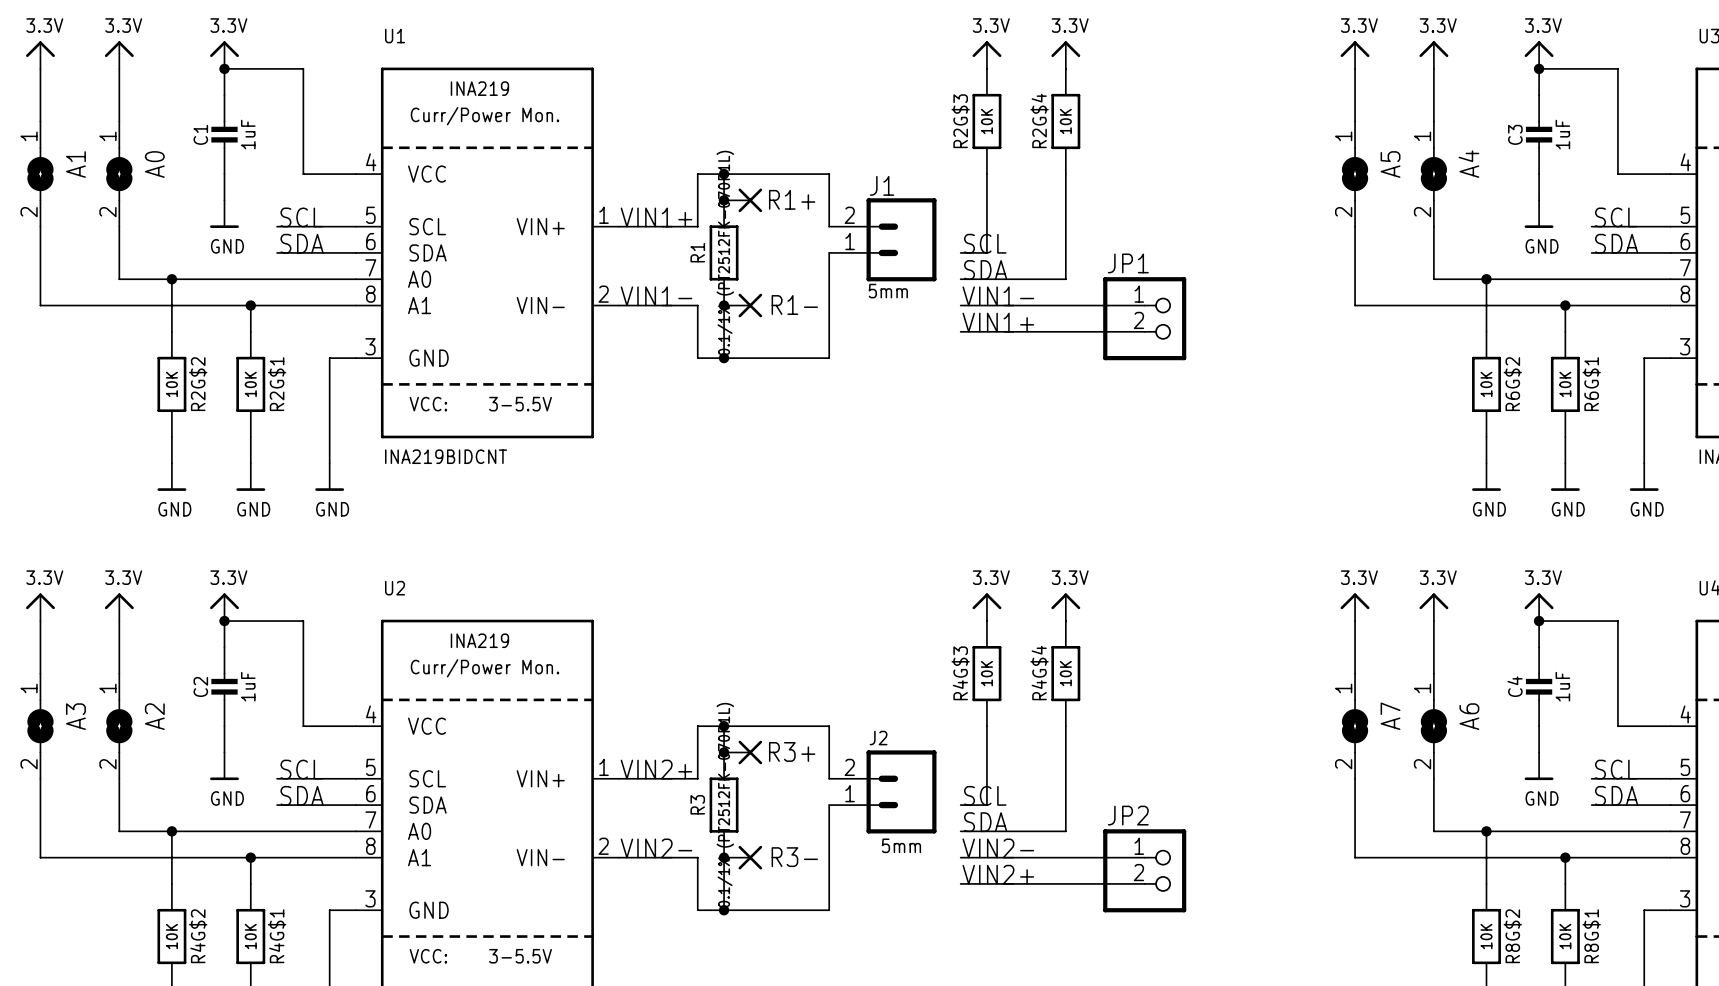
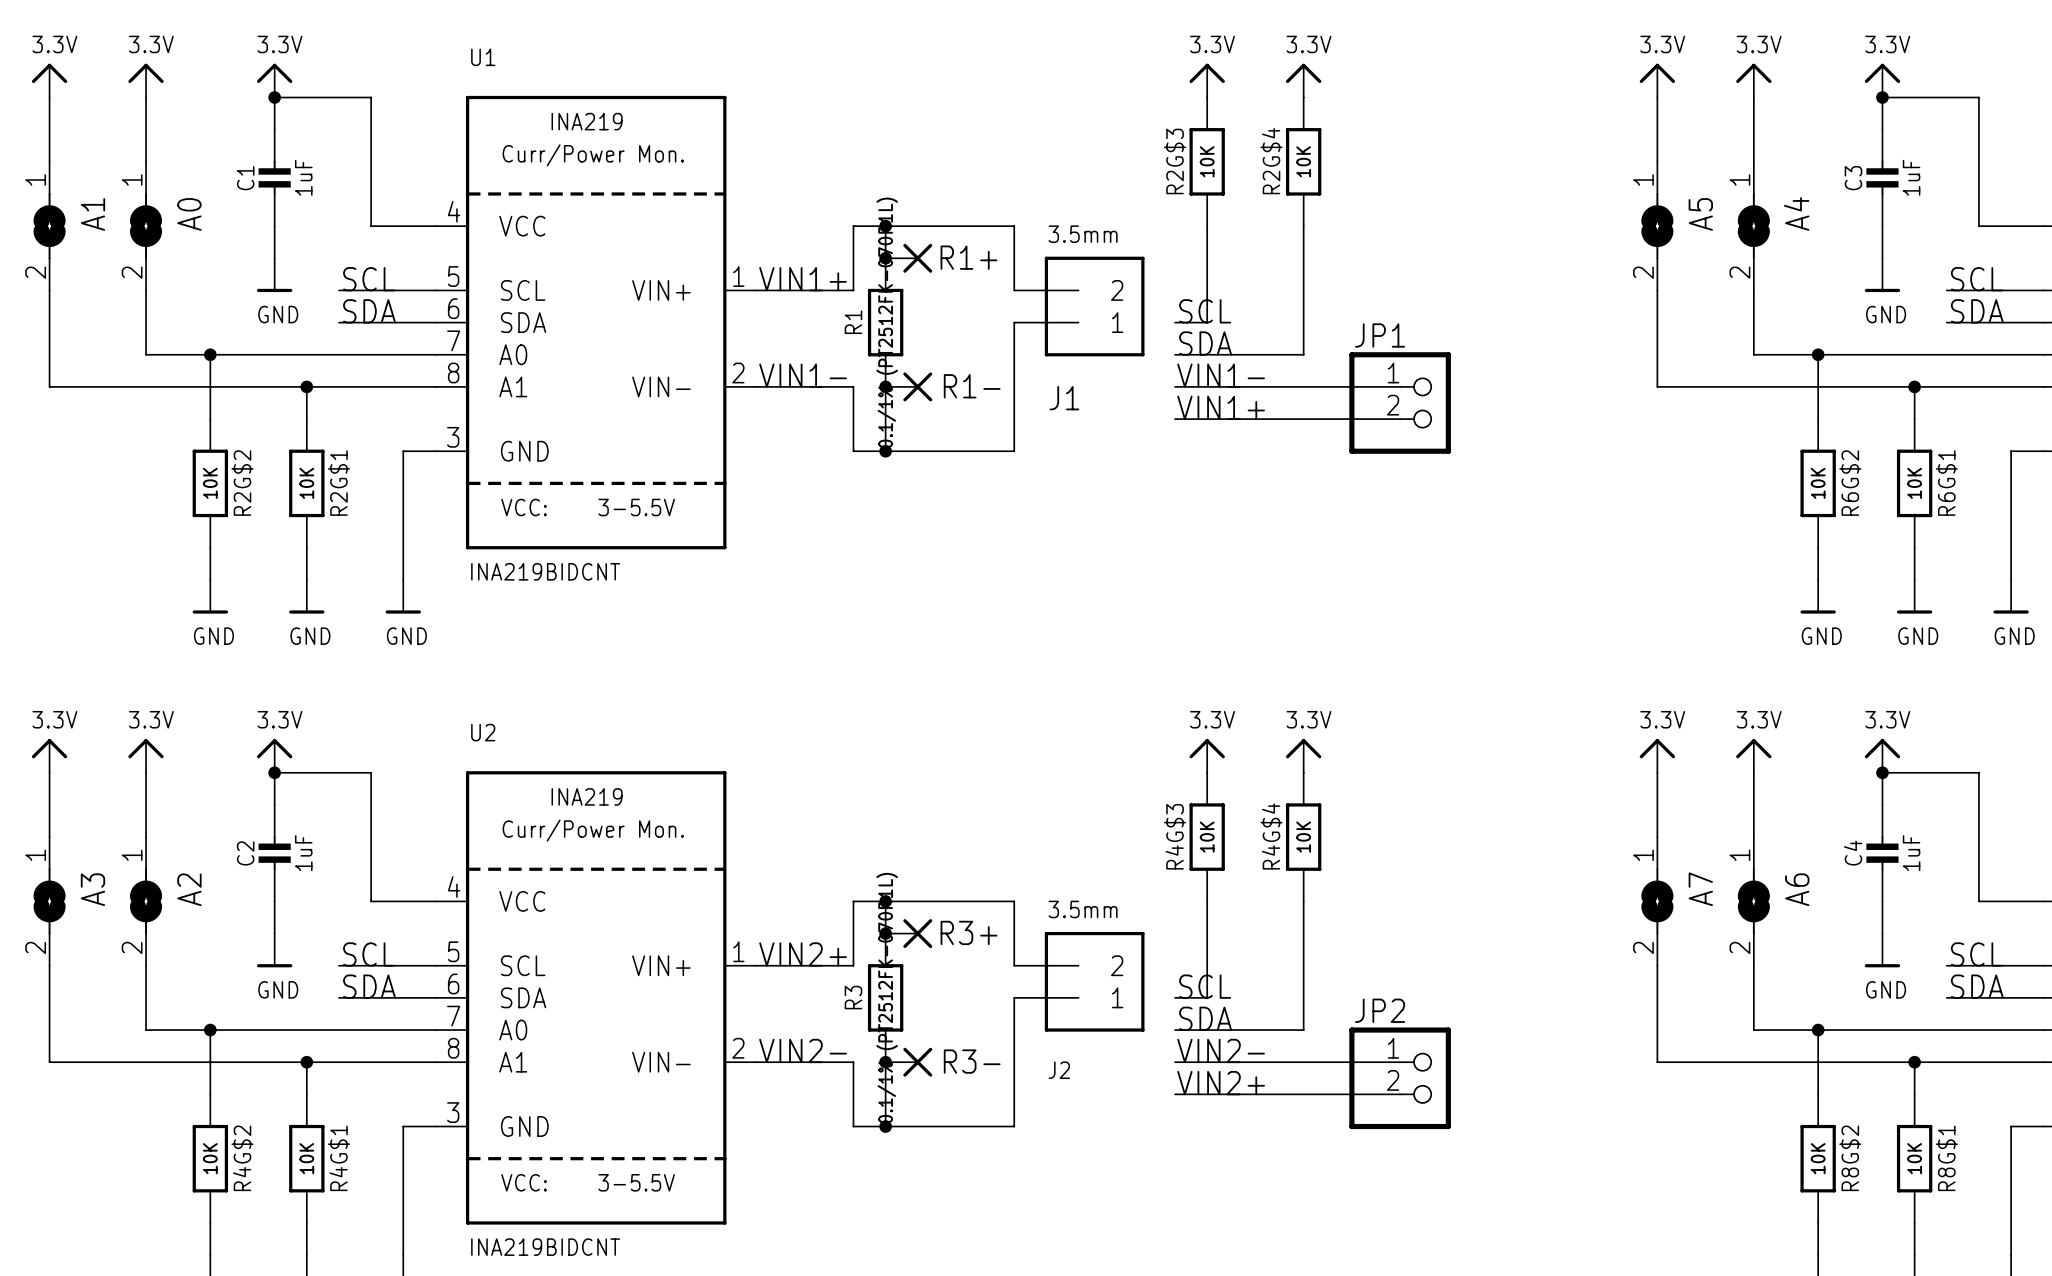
J1 name position: J1 (882, 185) -> J1 (1064, 398)
J1 symbol: [829, 198, 937, 282] -> [1014, 256, 1145, 357]
J1 value: 5mm (888, 291) -> 3.5mm (1083, 234)
J2 name position: J2 (878, 738) -> J2 (1059, 1070)
J2 symbol: [829, 750, 937, 834] -> [1014, 931, 1145, 1032]
J2 value: 5mm (901, 845) -> 3.5mm (1083, 909)

